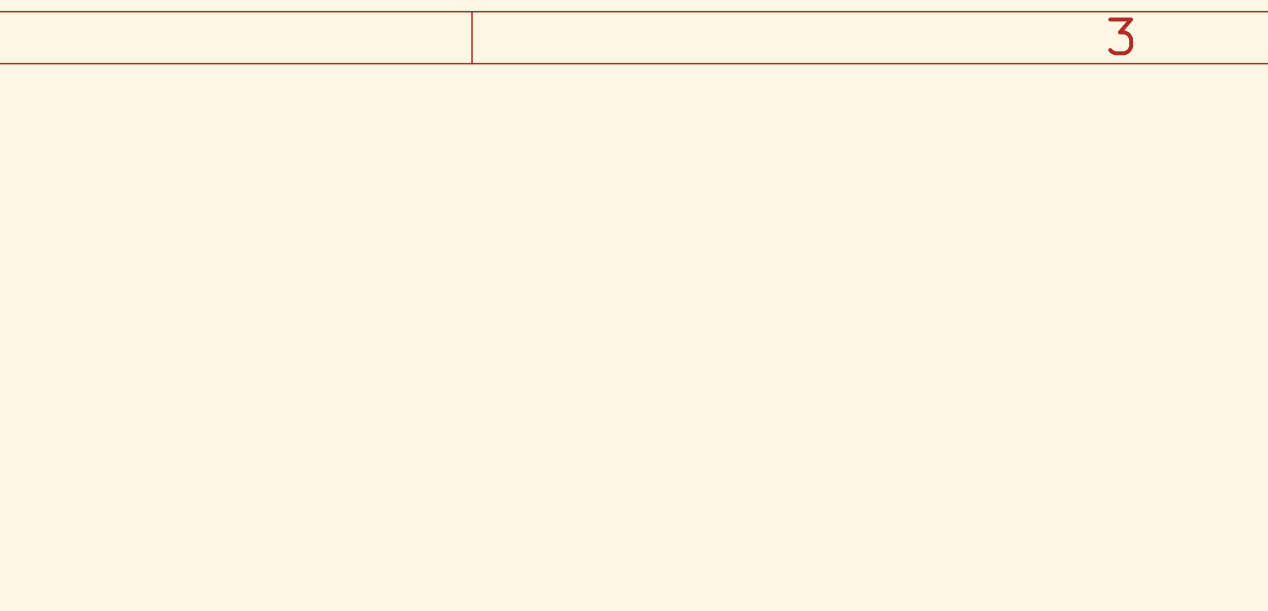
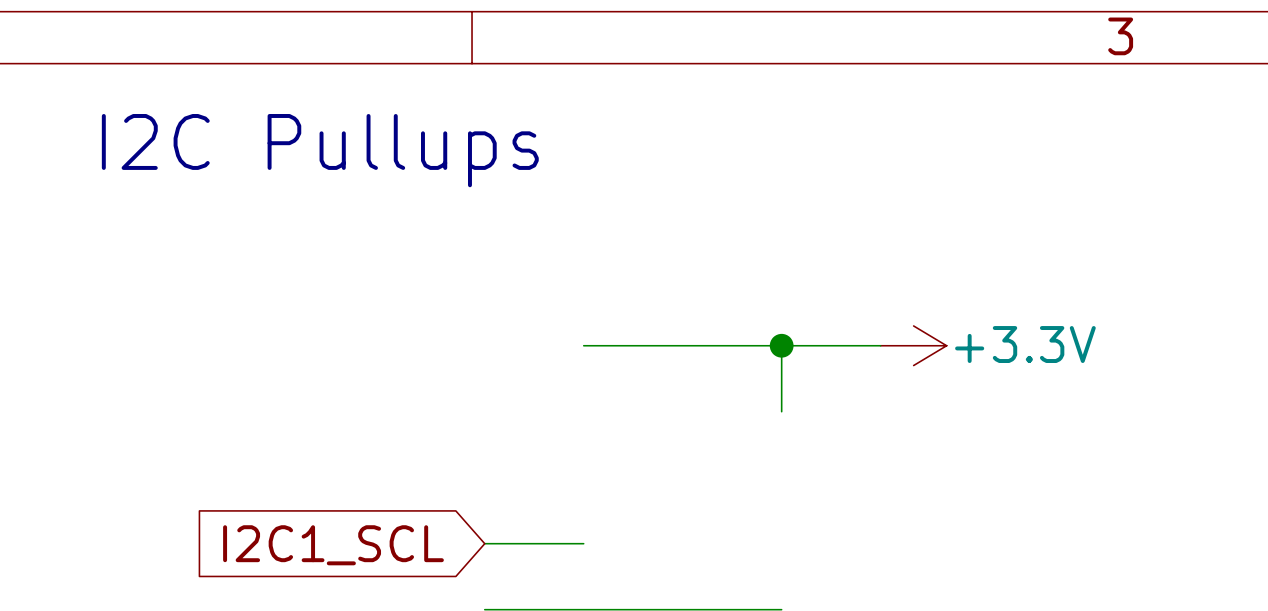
text: none -> I2C Pullups (320, 150)
wire: none -> (583, 345) (880, 345)
wire: none -> (781, 345) (781, 411)
junction: none -> (781, 345)
power symbol: none -> +3.3V (913, 345)
wire: none -> (484, 543) (583, 543)
global label: none -> I2C1_SCL (333, 545)
wire: none -> (484, 609) (781, 609)

